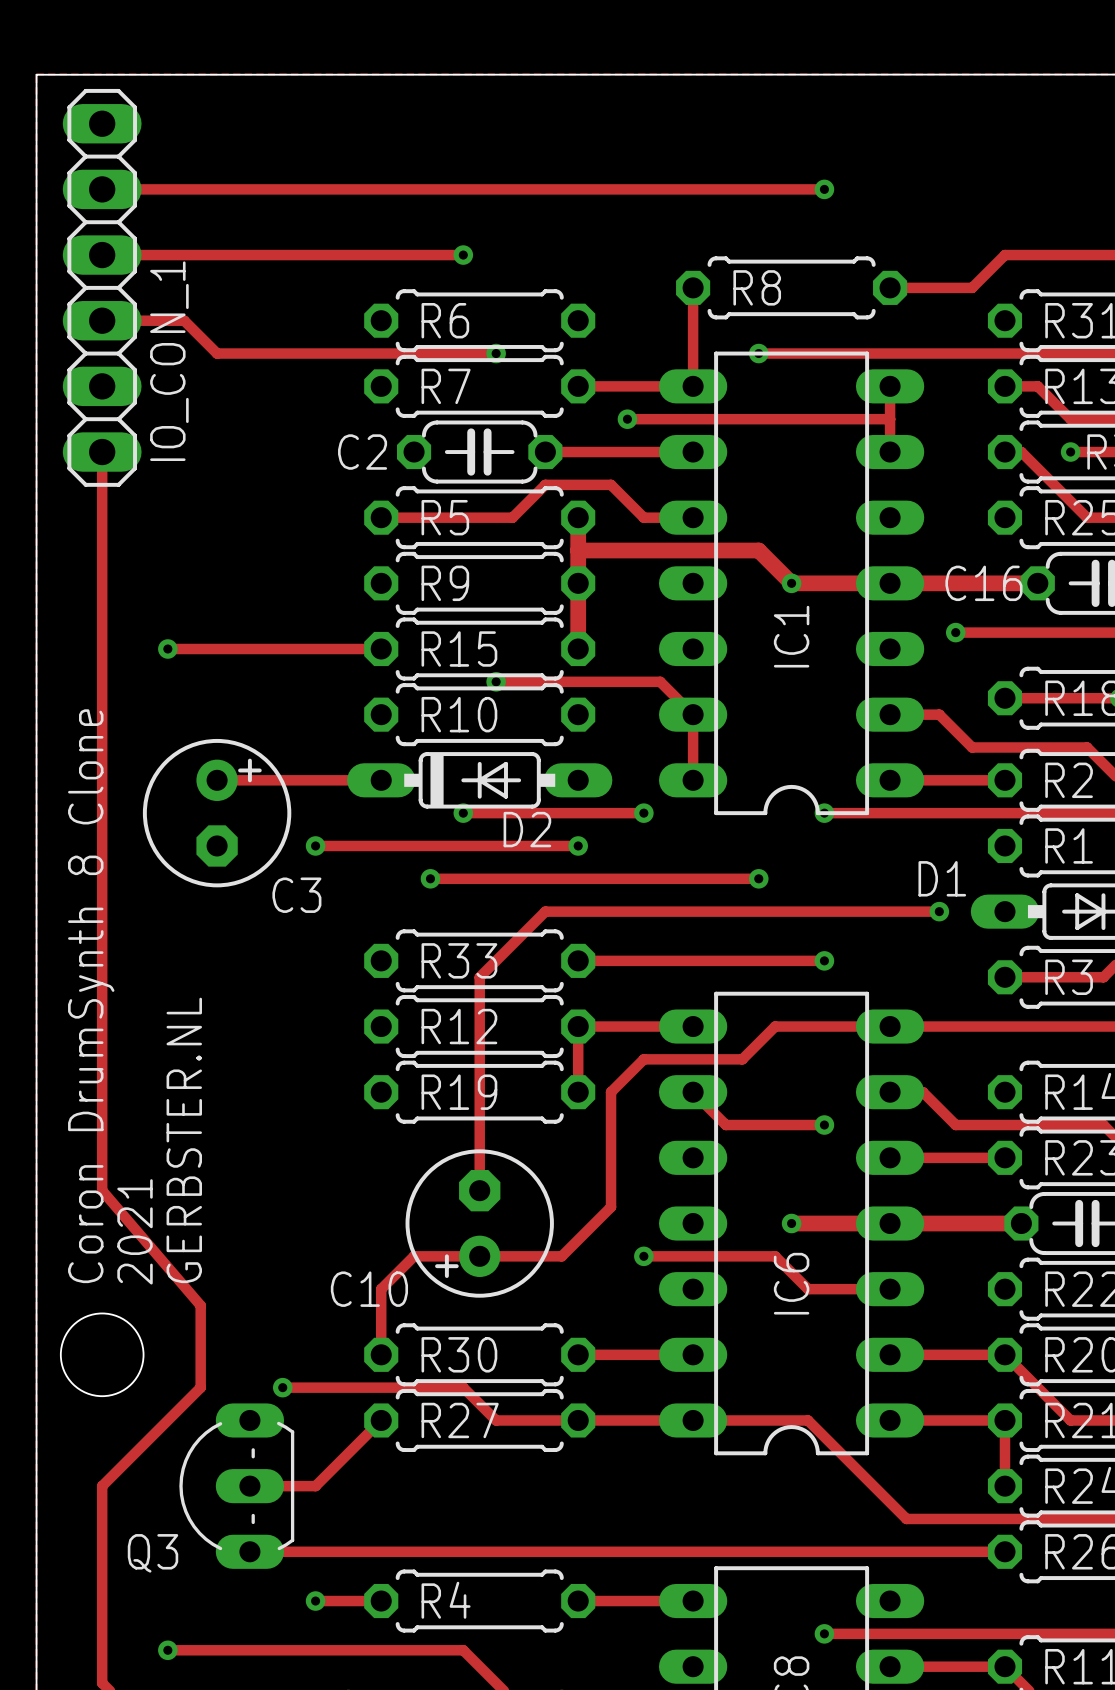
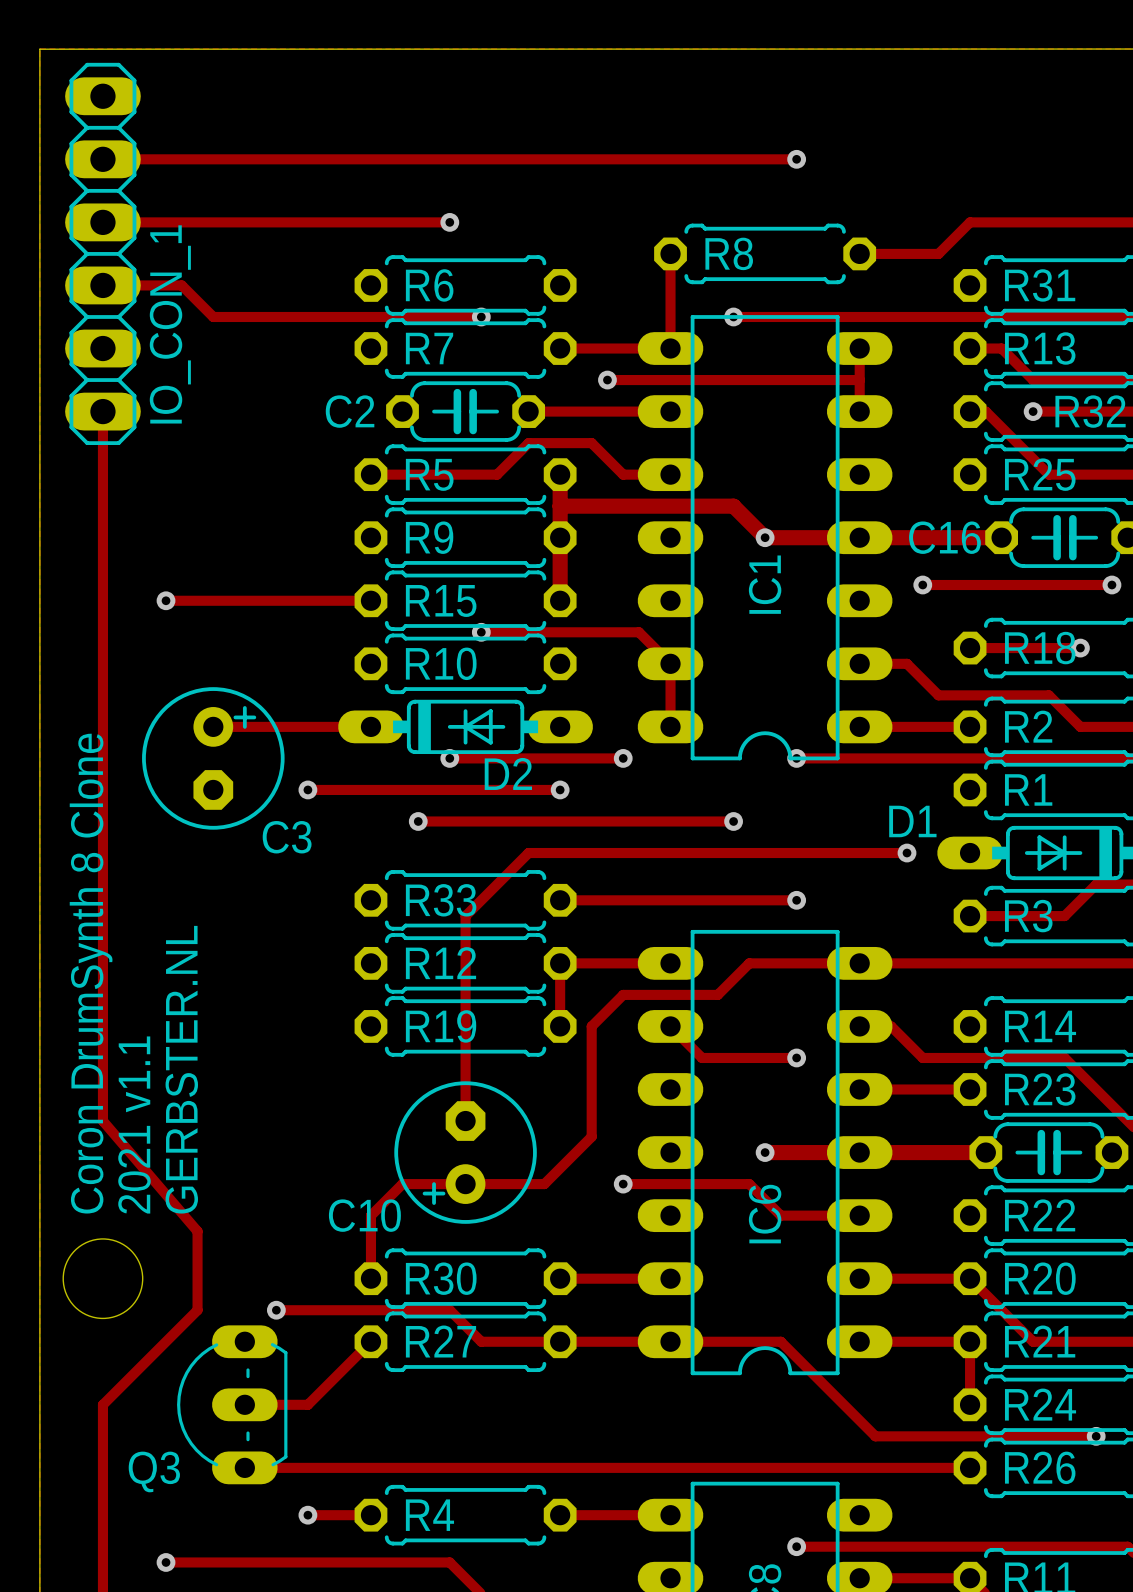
text: 2021 (135, 1231) -> 2021 v1.1 (134, 1125)

